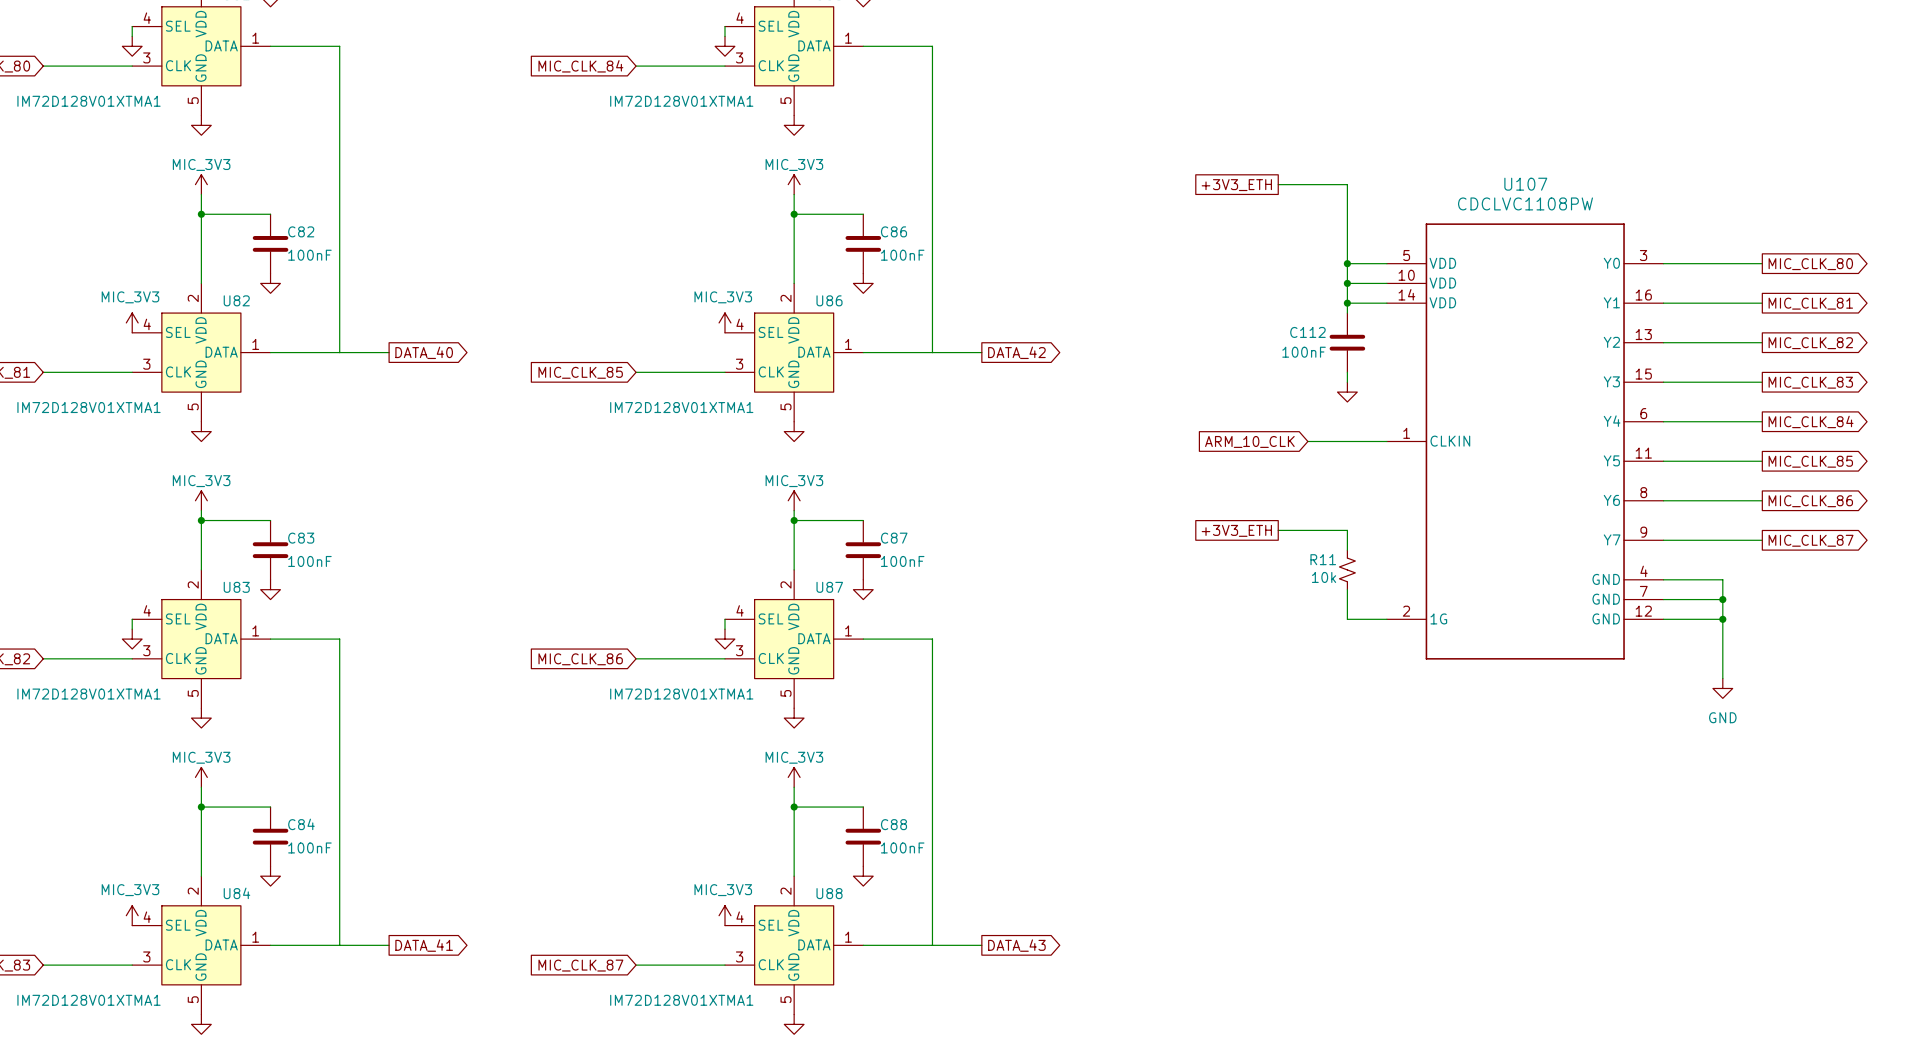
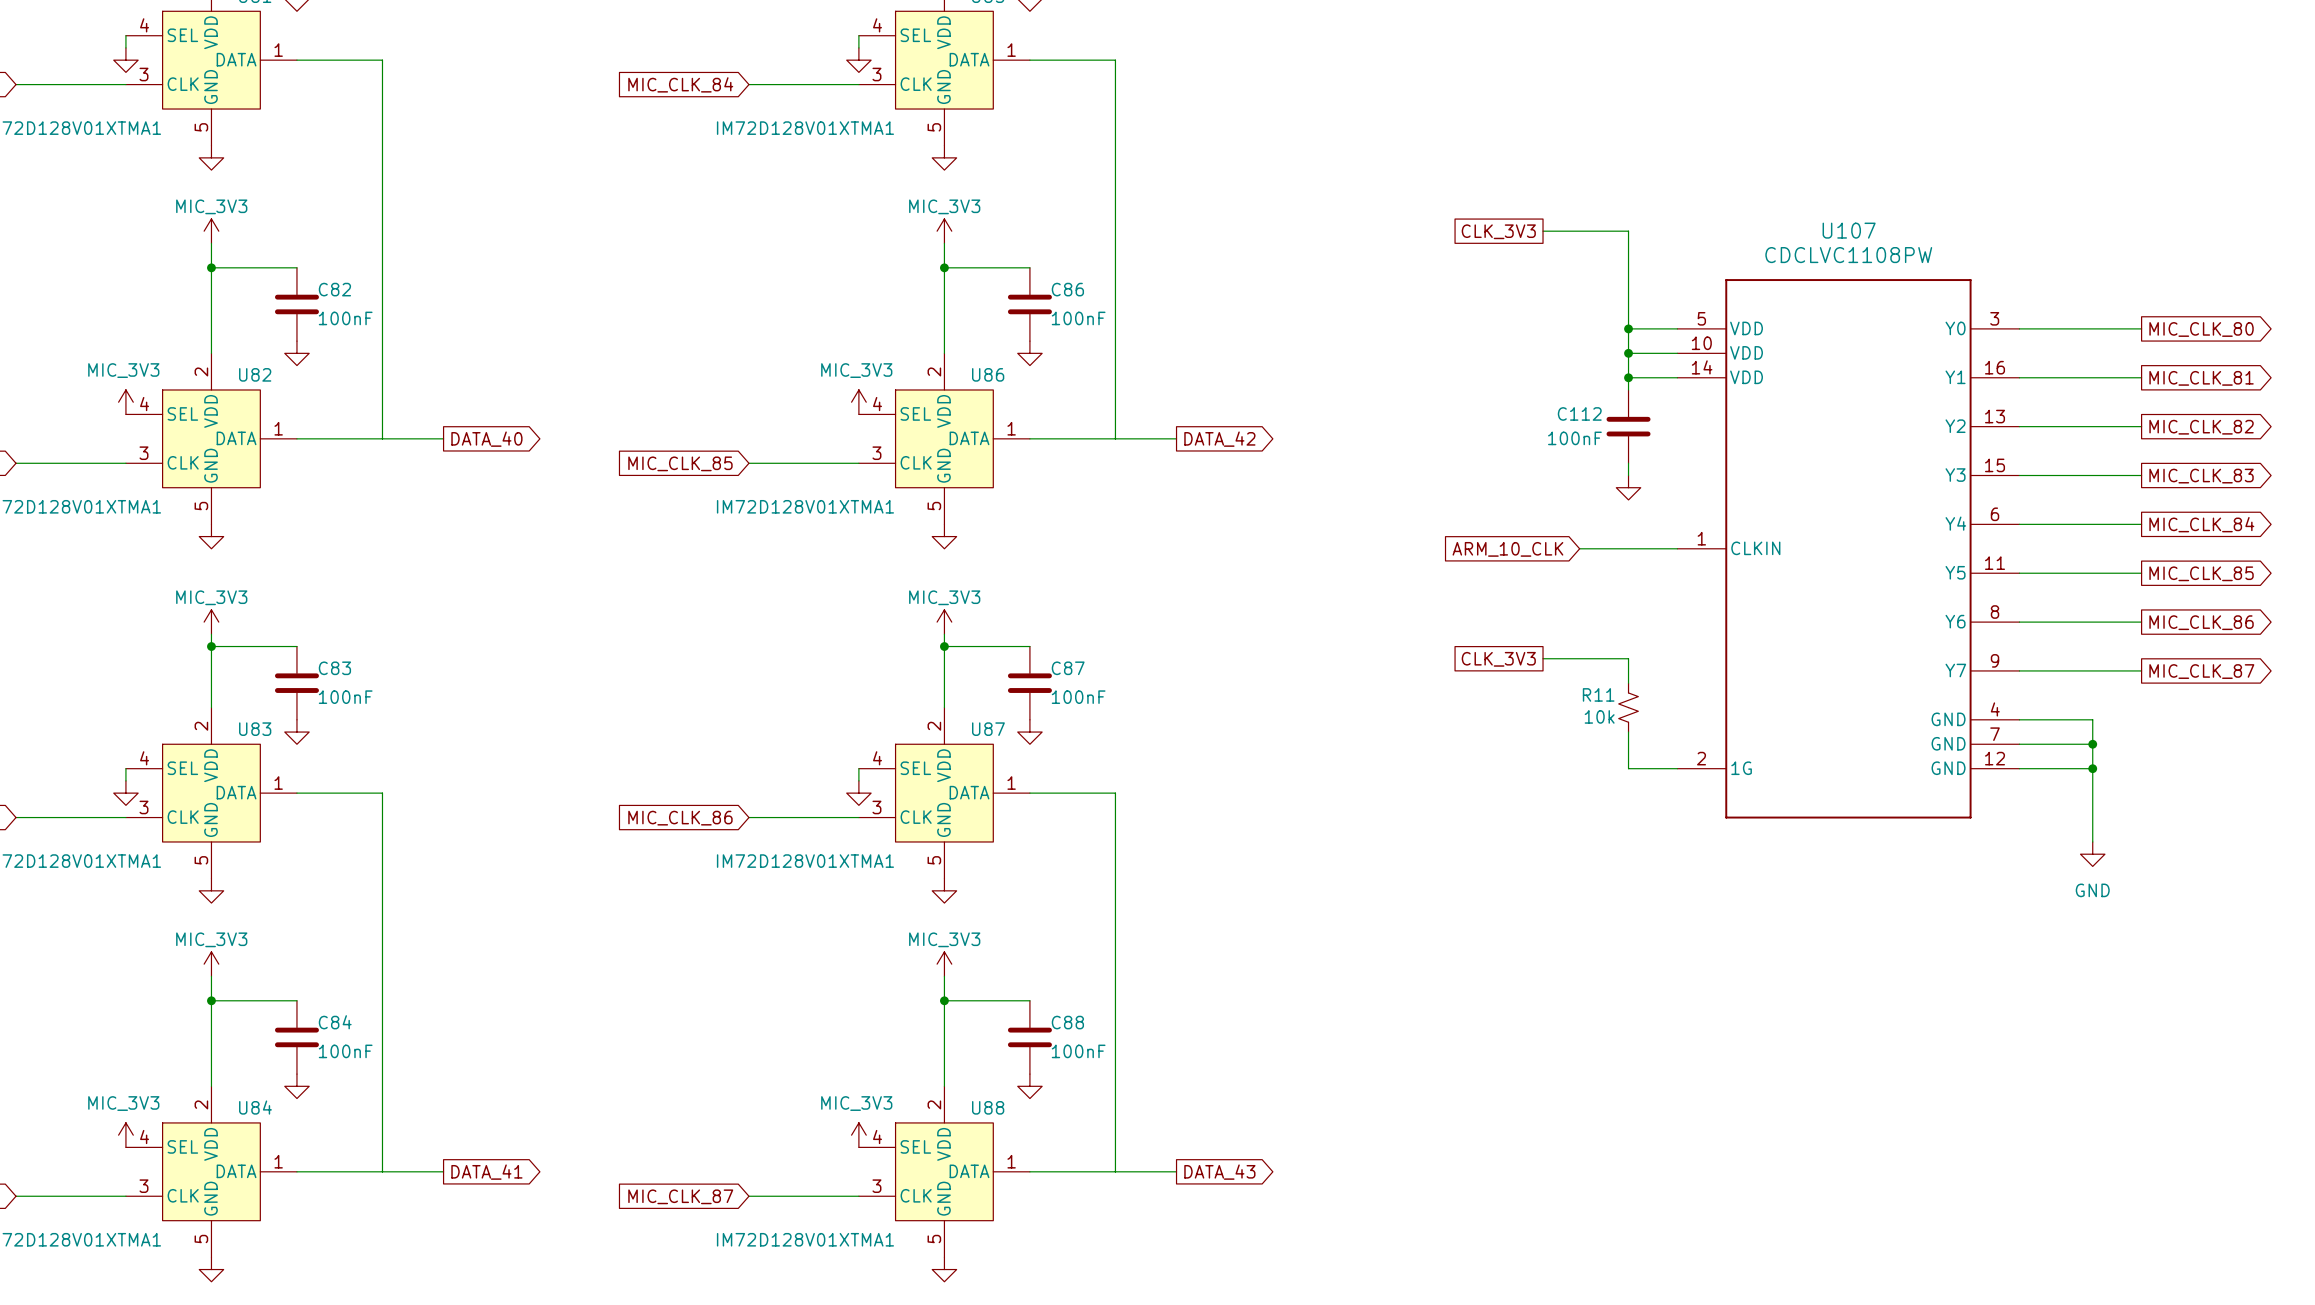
global label: +3V3_ETH (1236, 185) -> CLK_3V3 (1498, 231)
global label: +3V3_ETH (1236, 530) -> CLK_3V3 (1498, 659)

